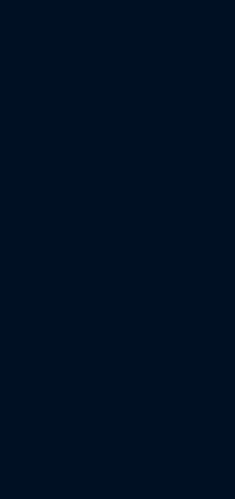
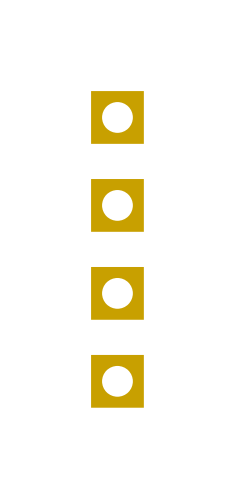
part: none -> (117, 249)

